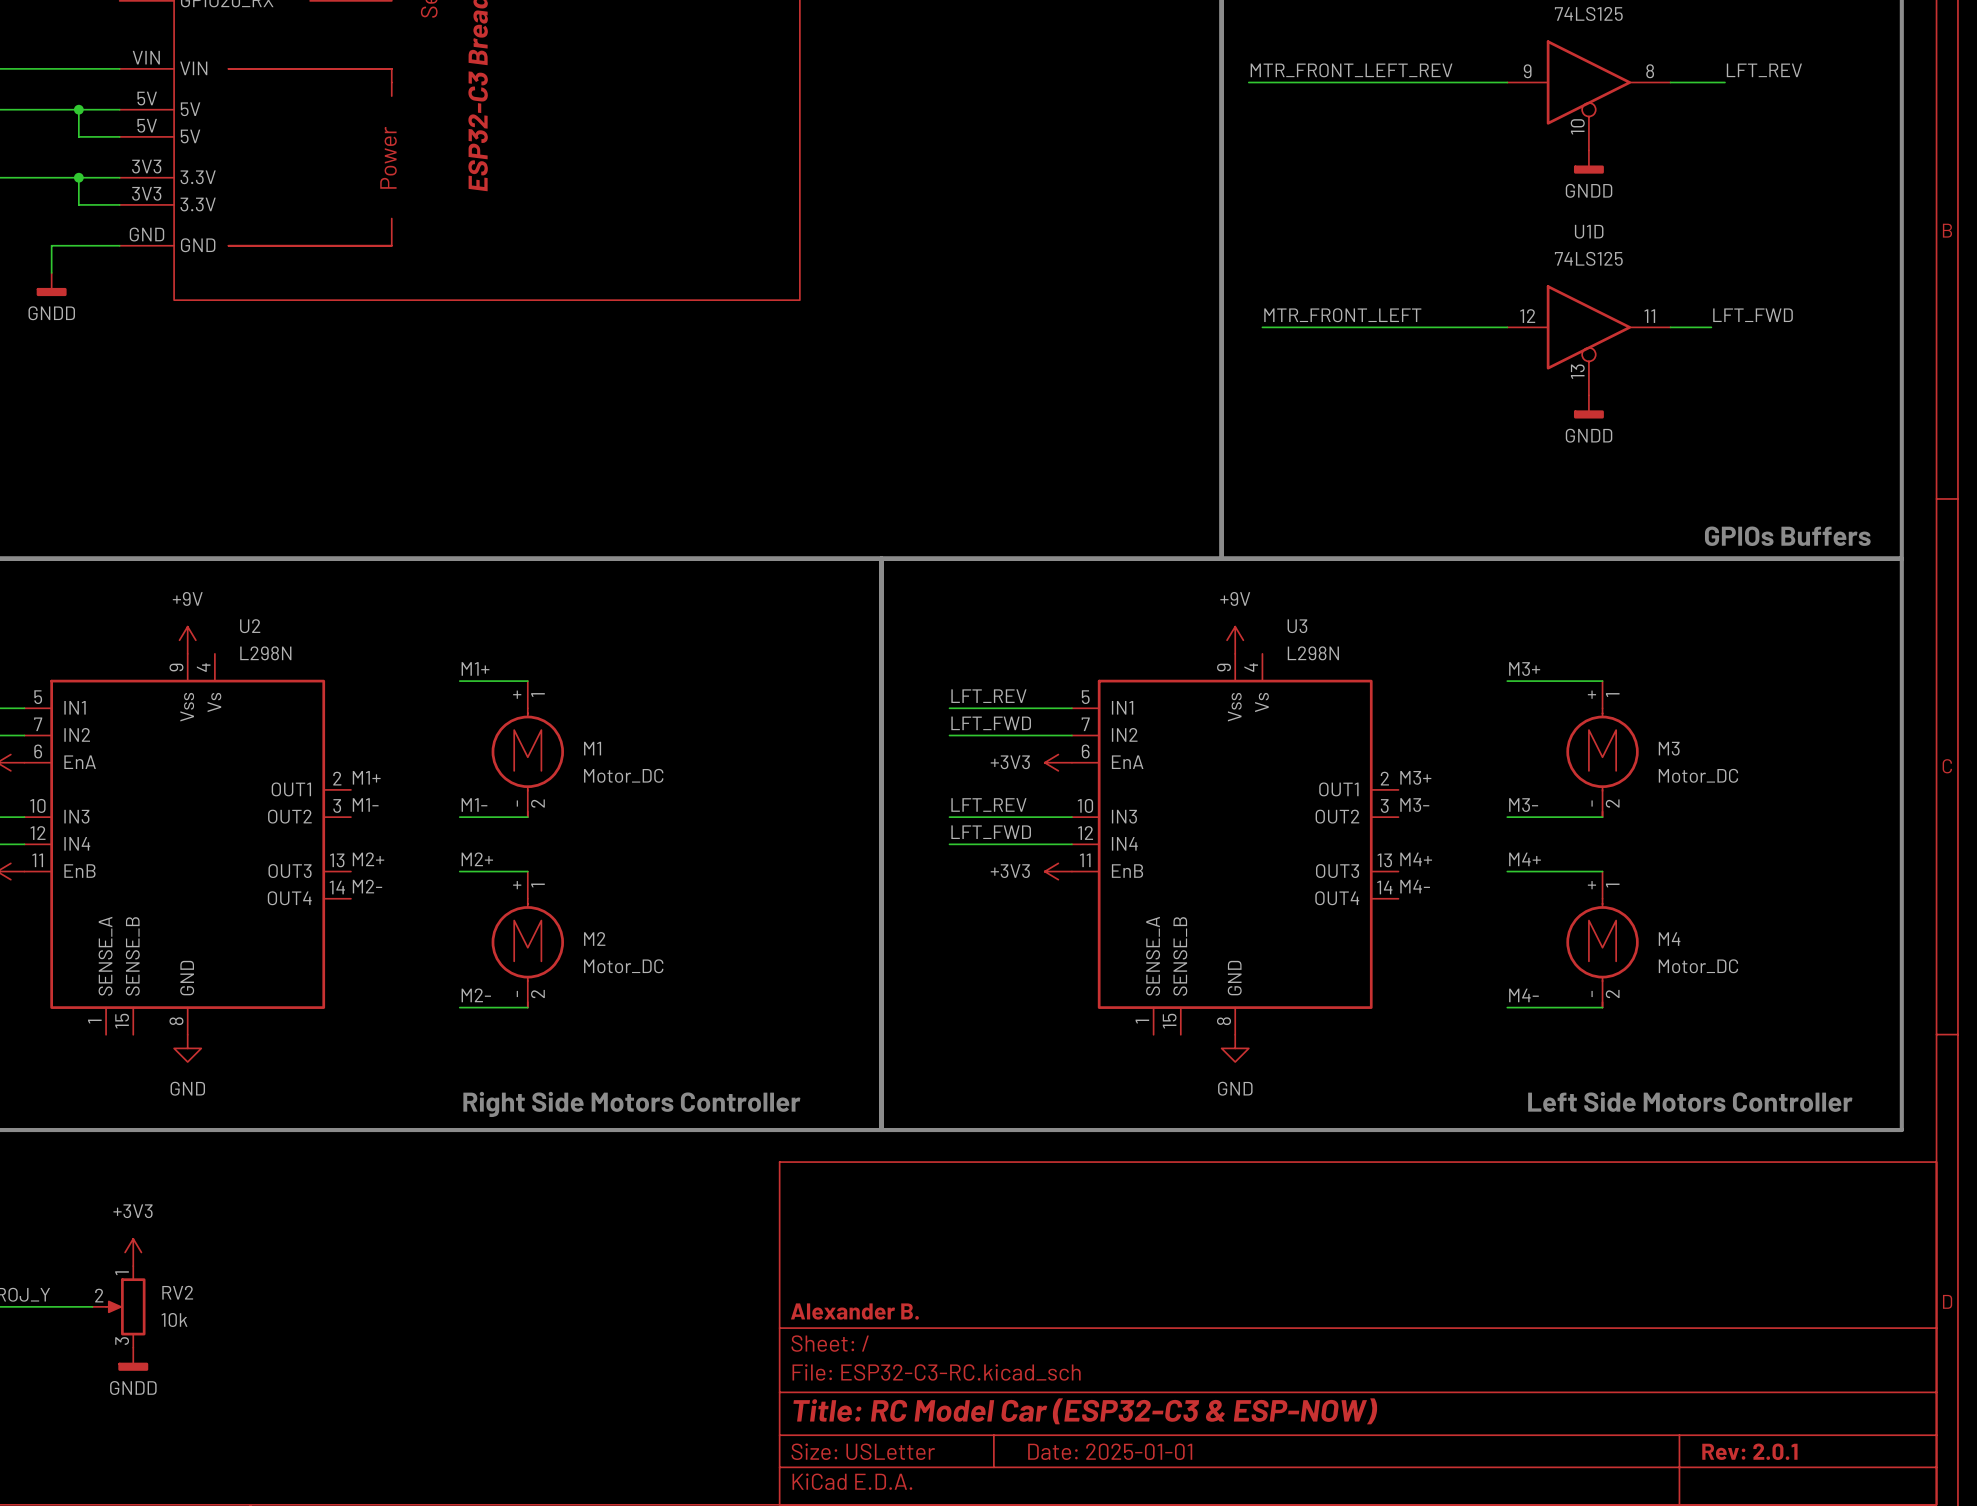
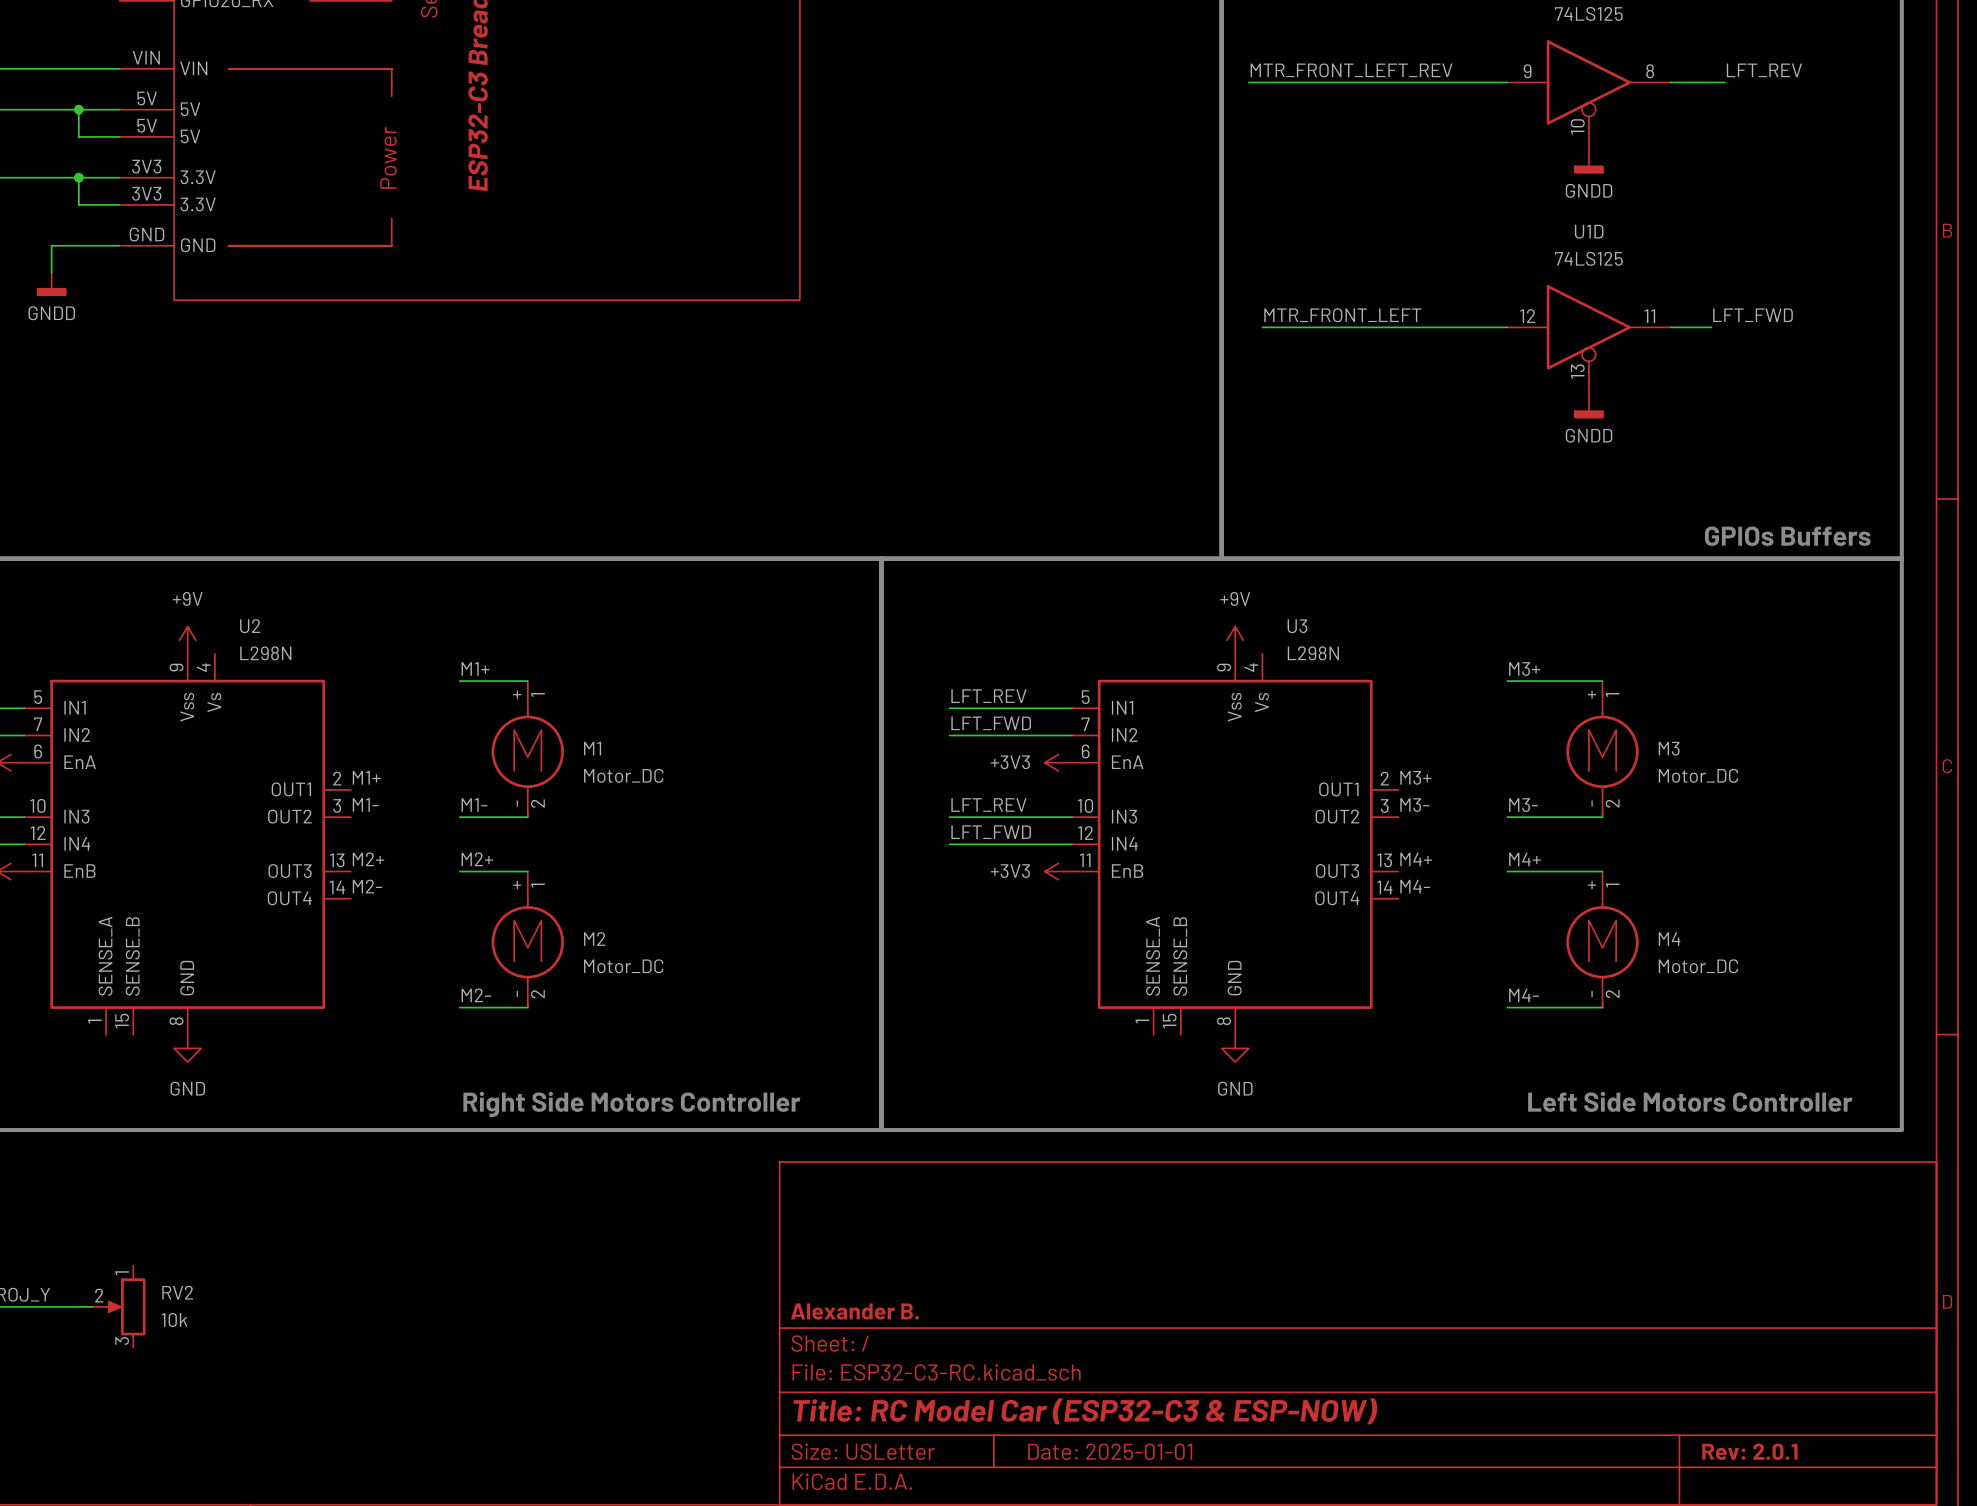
power symbol: +3V3 (133, 1252) -> none
power symbol: GNDD (133, 1359) -> none

